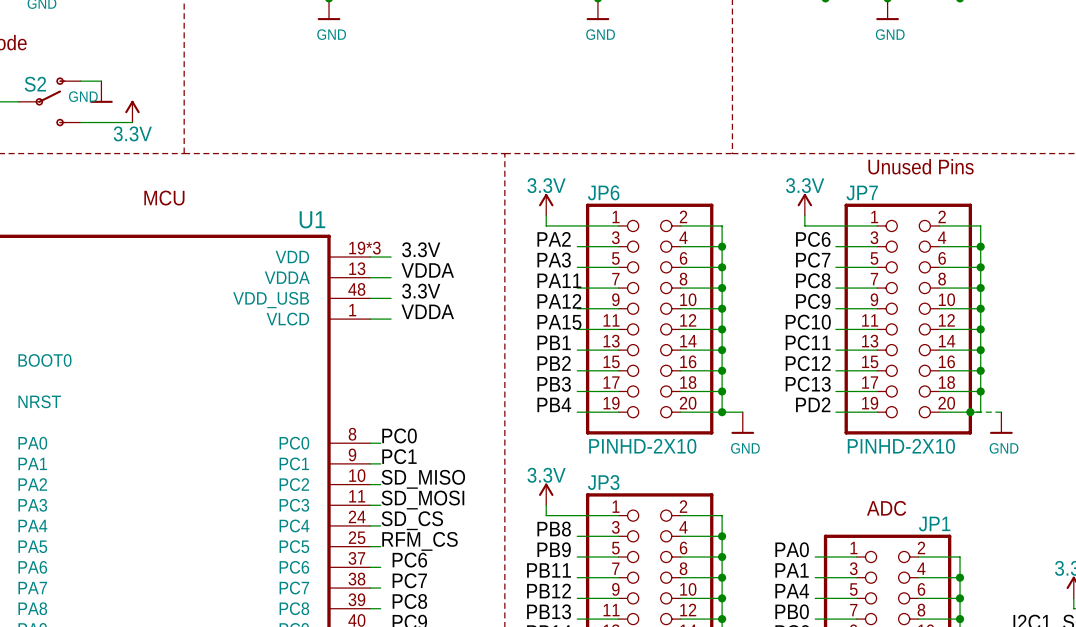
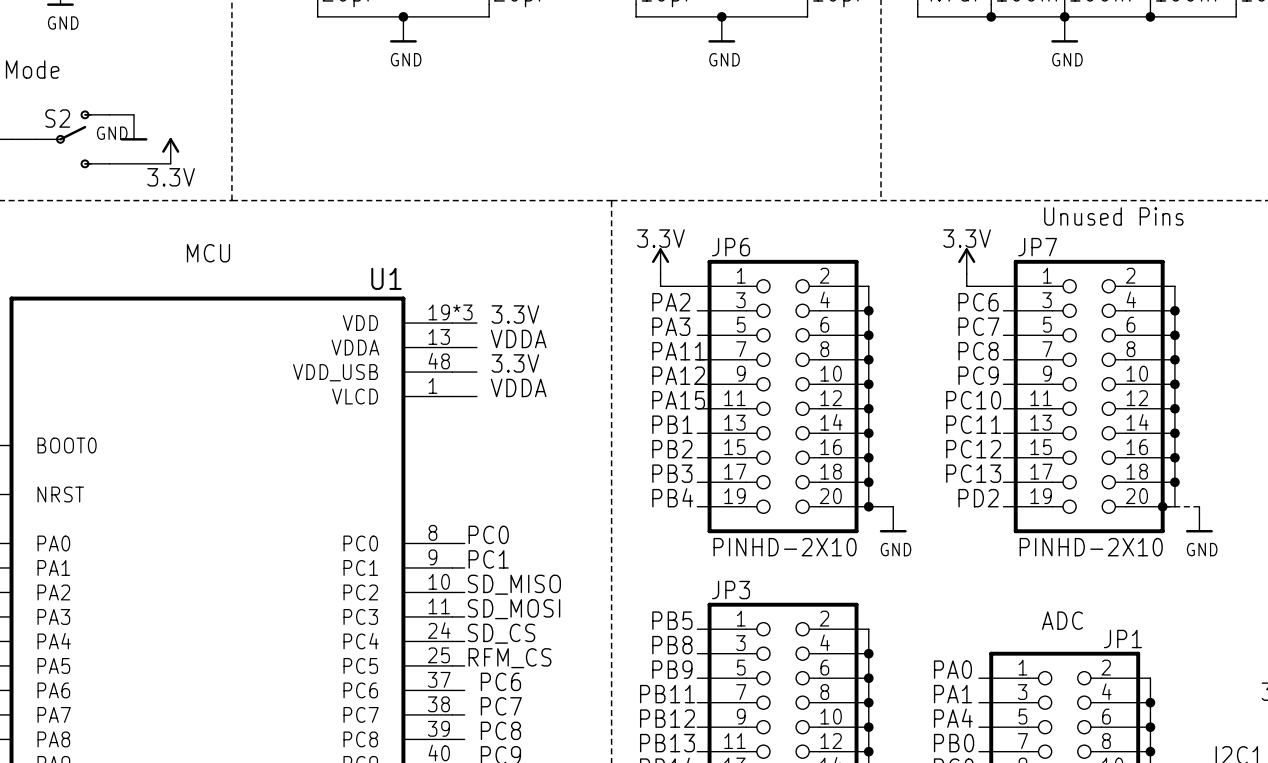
power symbol: 3.3V (546, 494) -> none
wire: (546, 505) (546, 515) (577, 515) -> none
label: none -> PB5 (672, 620)

